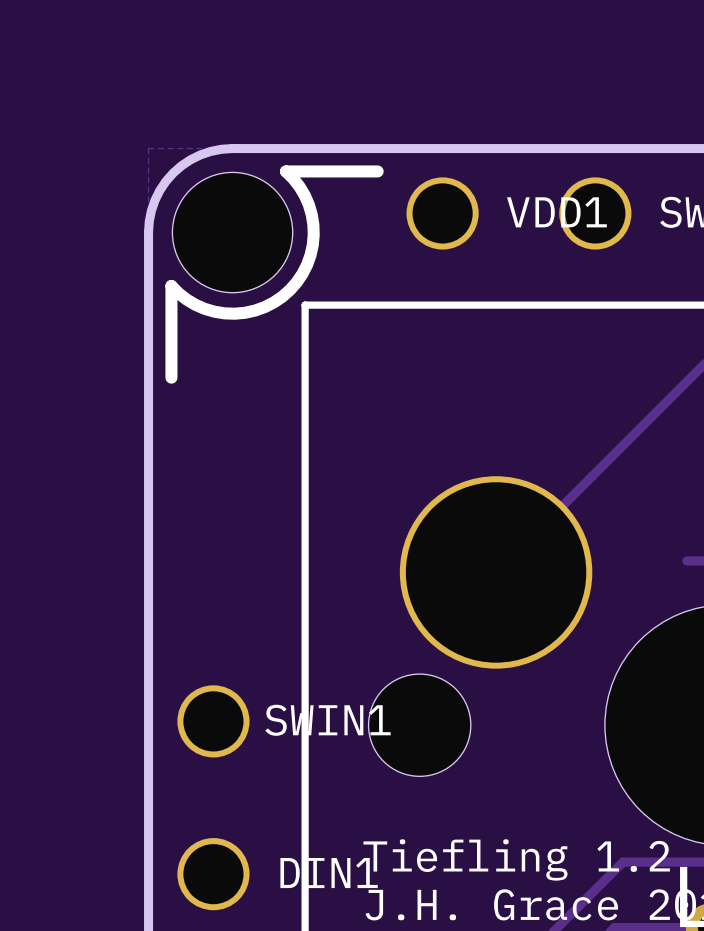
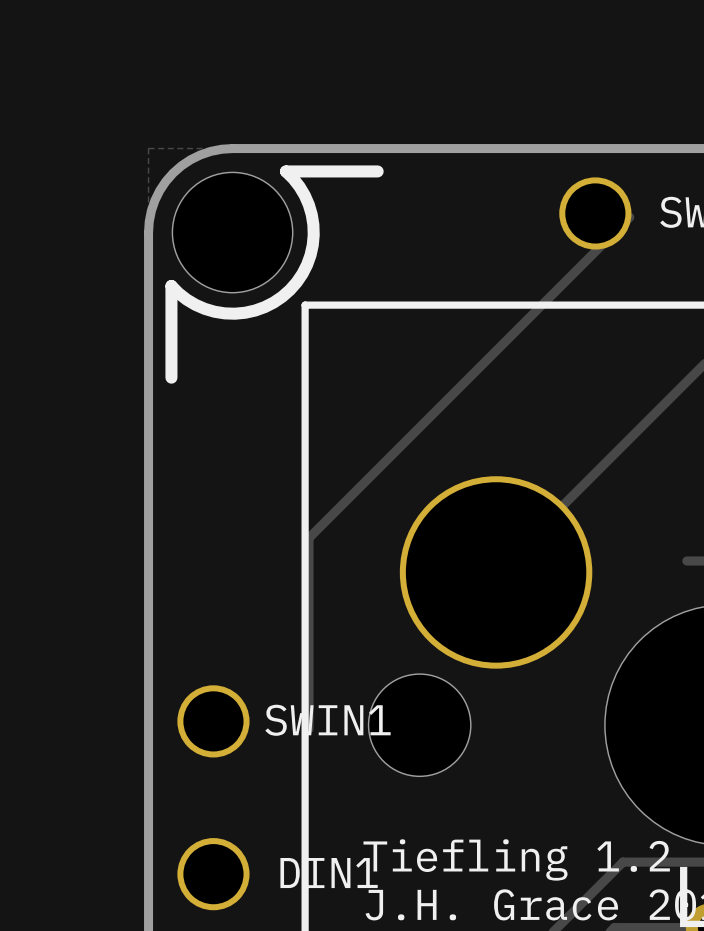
VDD1: (442, 213) -> none
track: none -> (629, 217) (308, 538) (308, 729)

